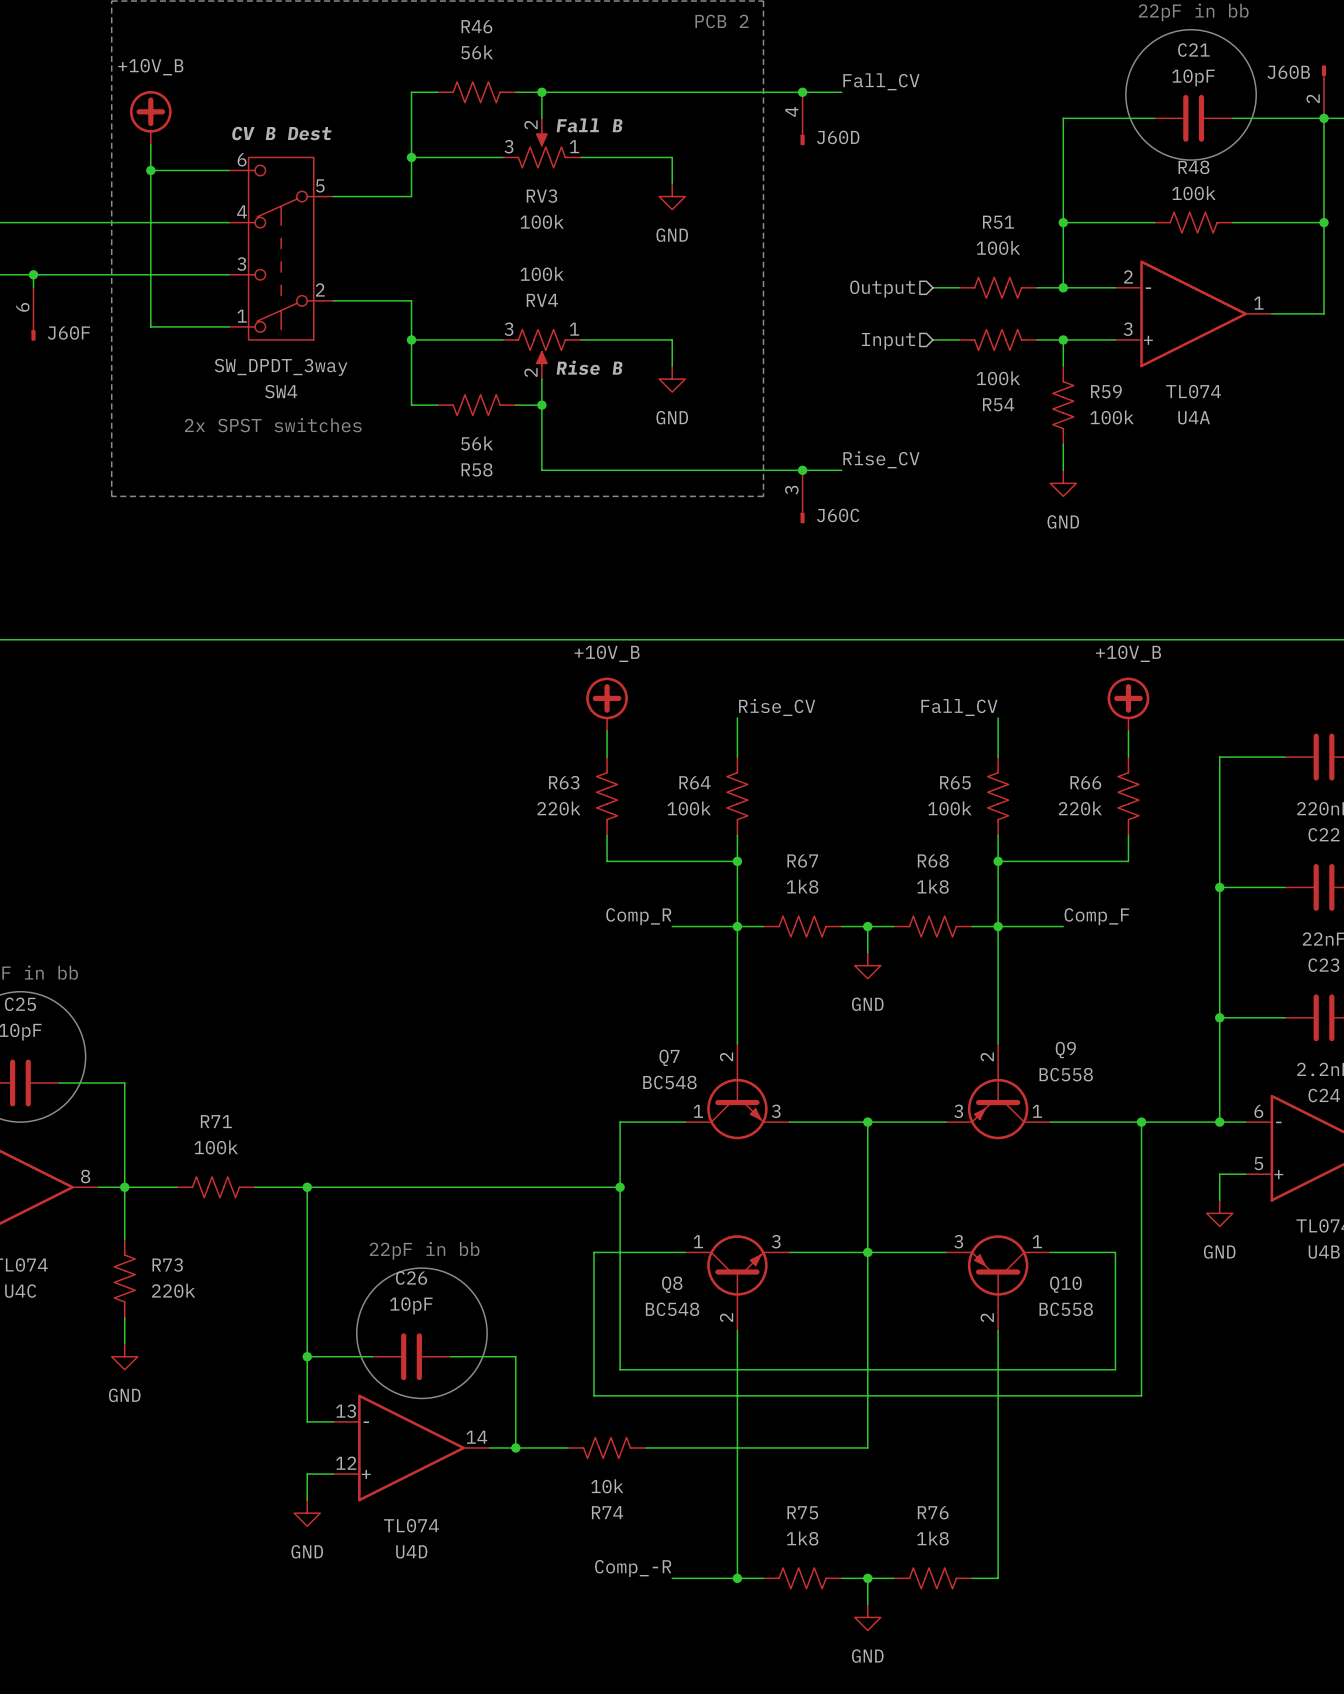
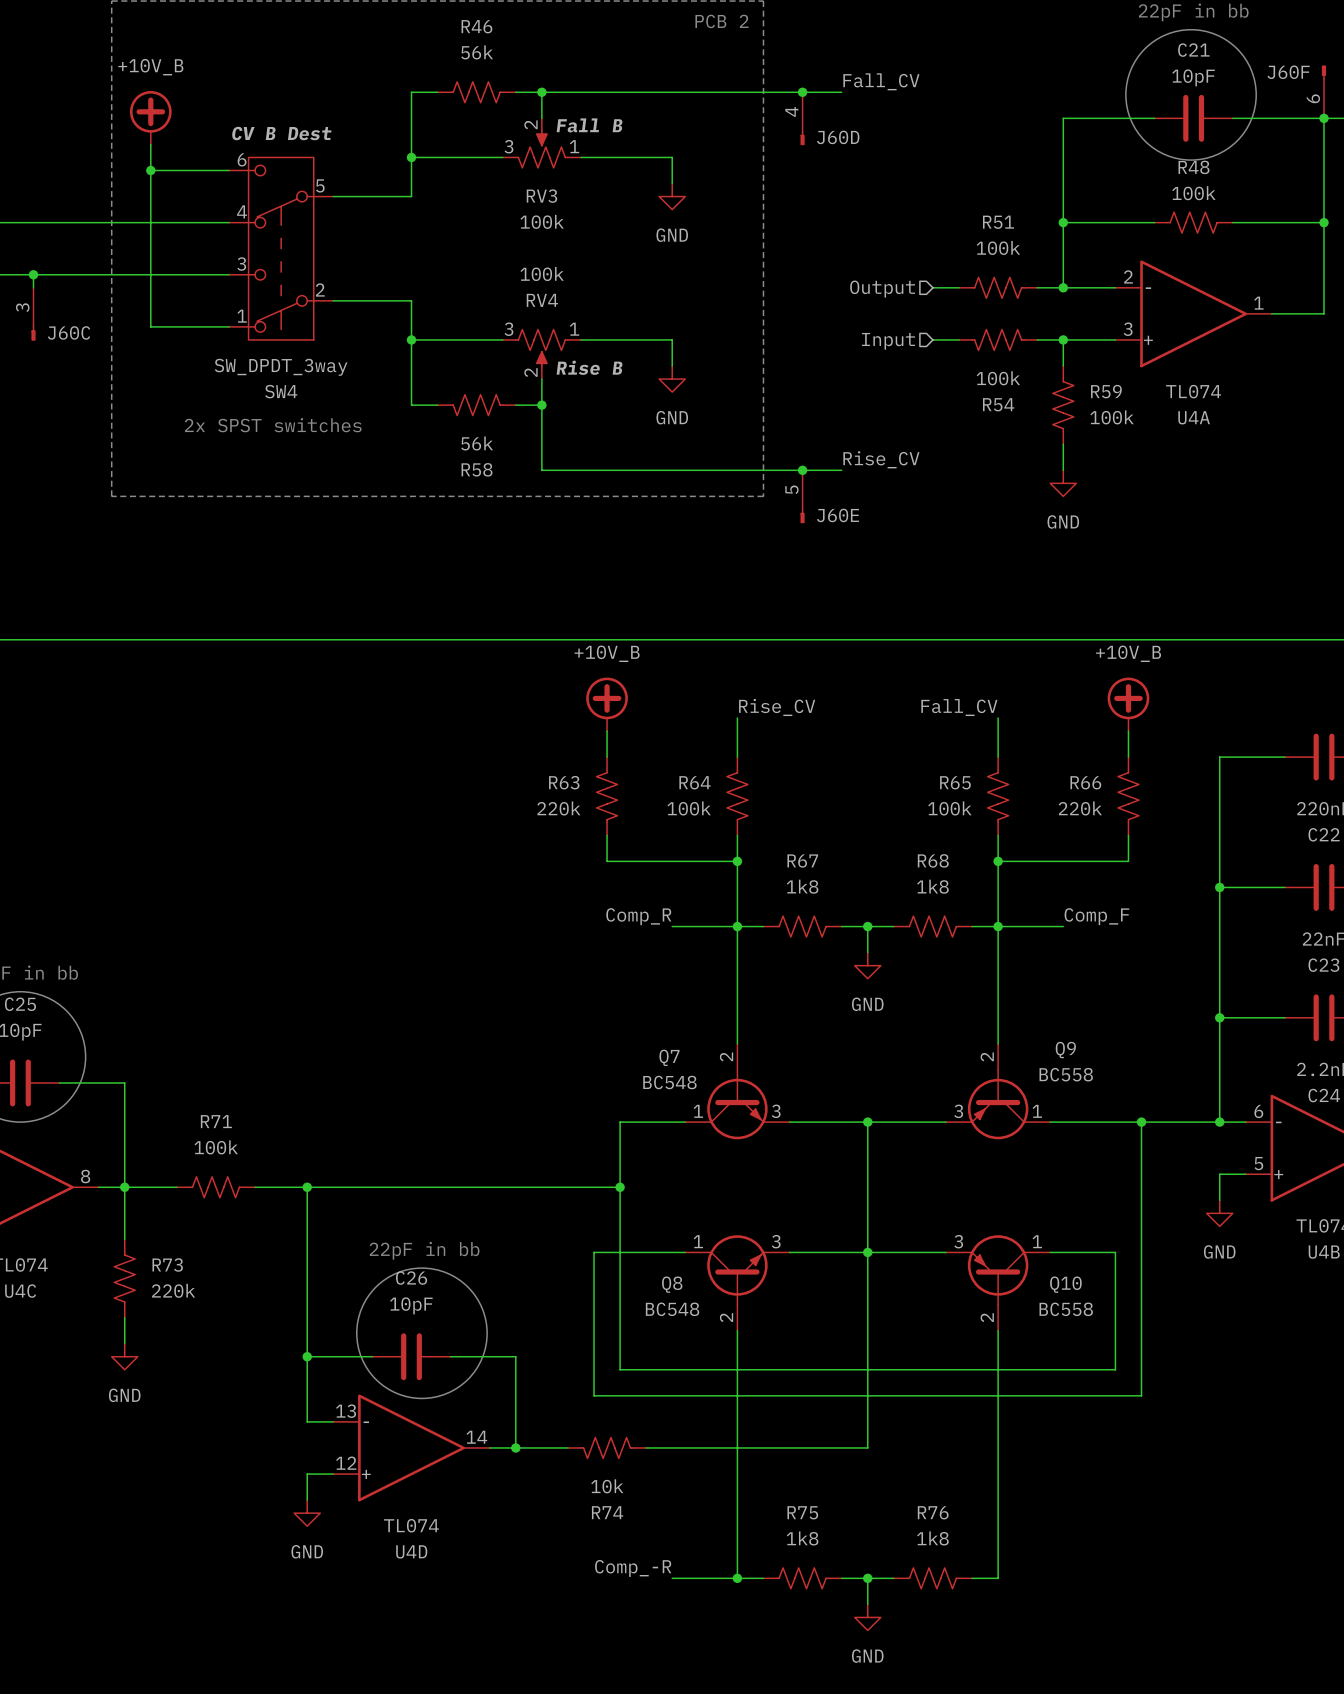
J60B: (1324, 91) -> none
J60F position: (33, 314) -> (1324, 91)
J60F rotation: 0° (33, 333) -> 180° (1324, 72)
J60C position: (802, 496) -> (33, 314)
J60E: none -> (802, 496)

